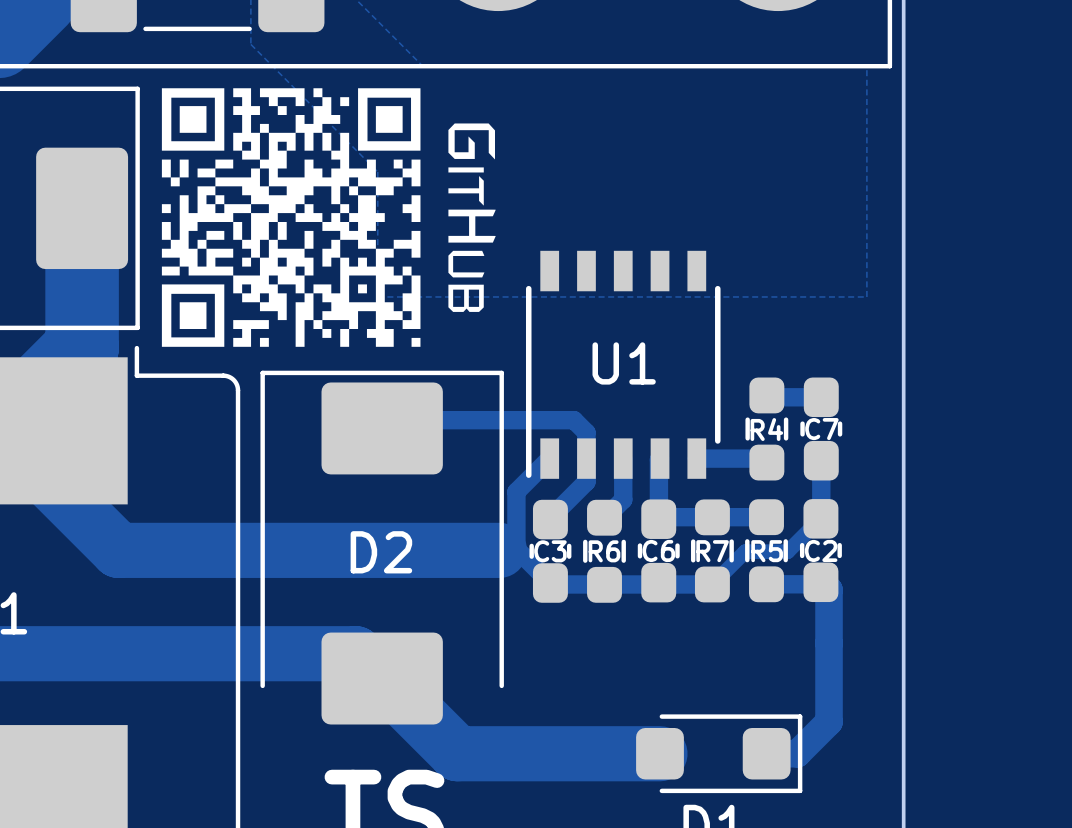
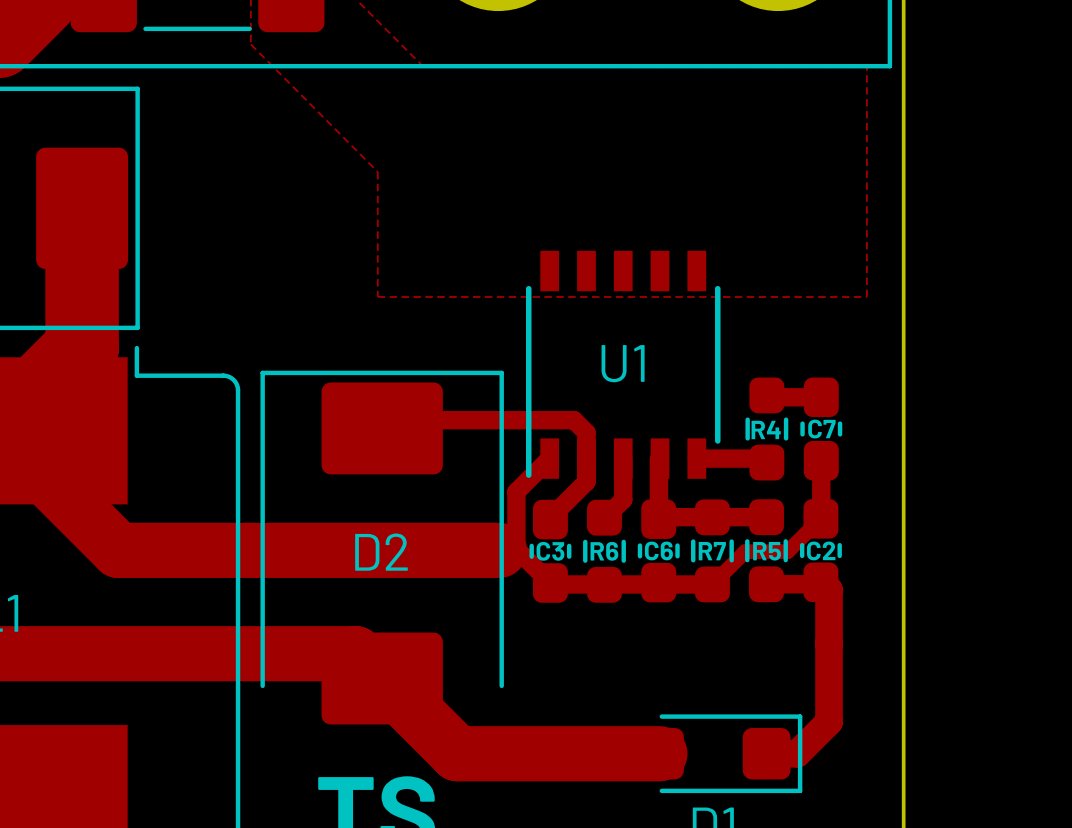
drawing: [161, 88, 496, 347] -> none

